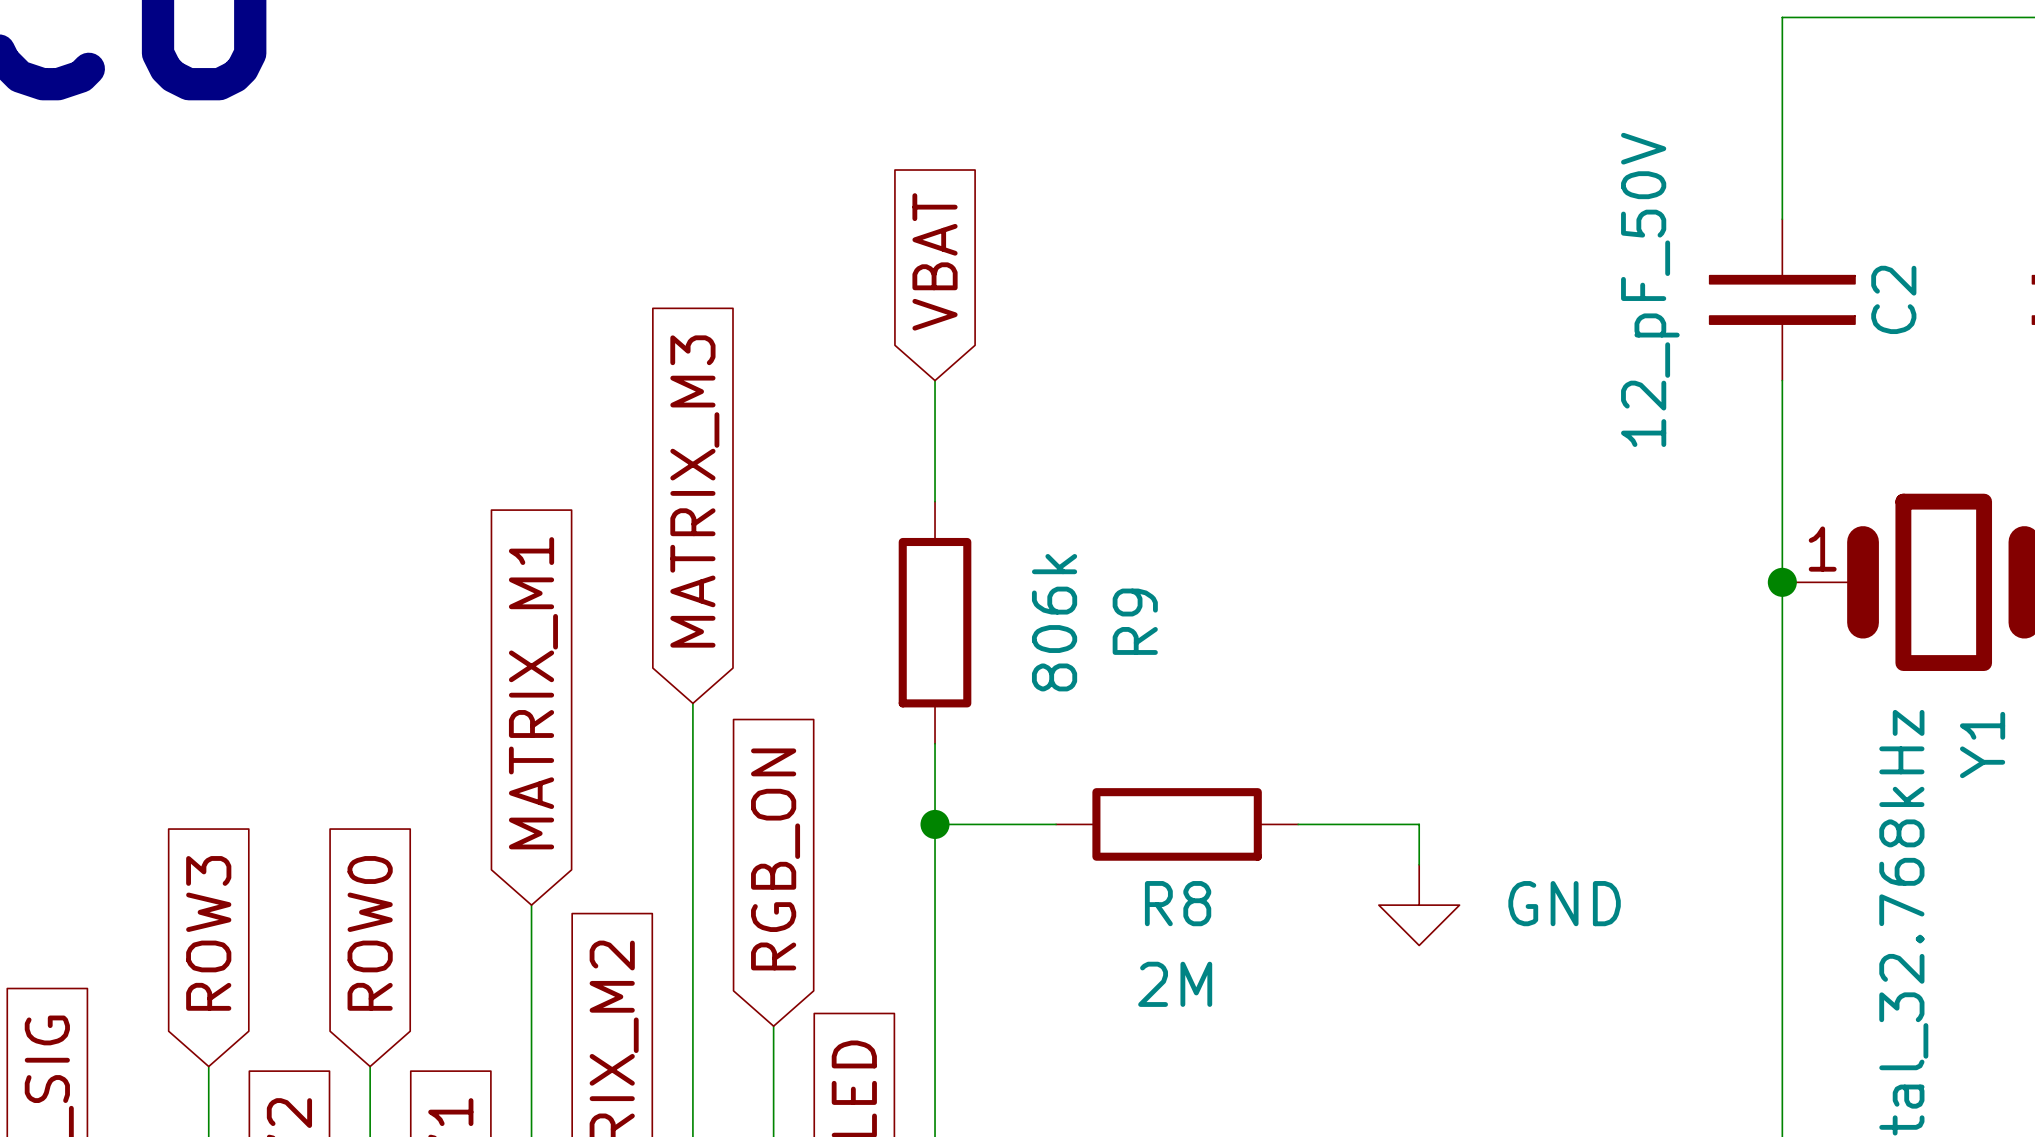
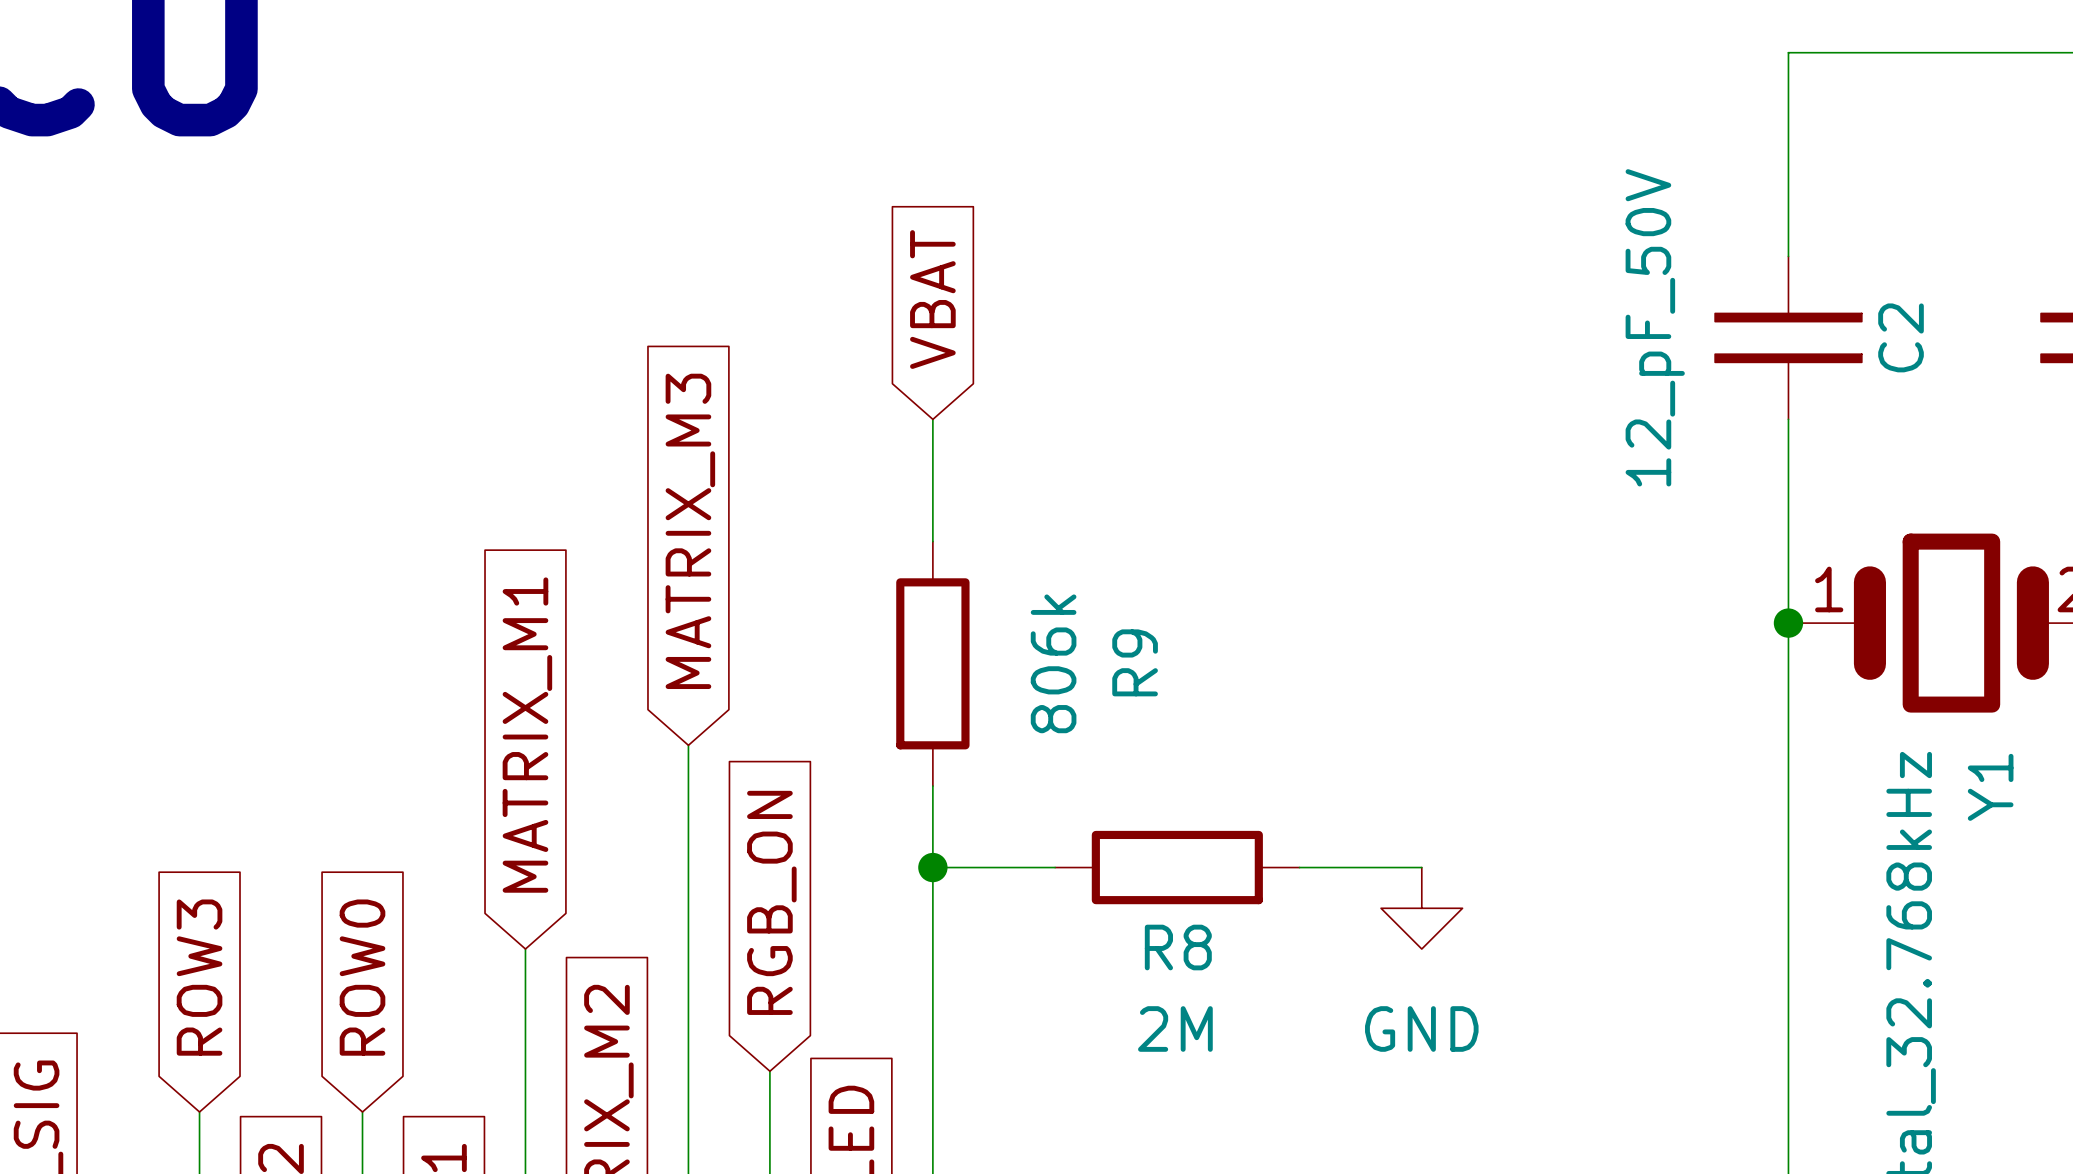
power symbol text position: GND (1564, 903) -> GND (1421, 1028)
power symbol position: GND (1419, 905) -> GND (1421, 908)

